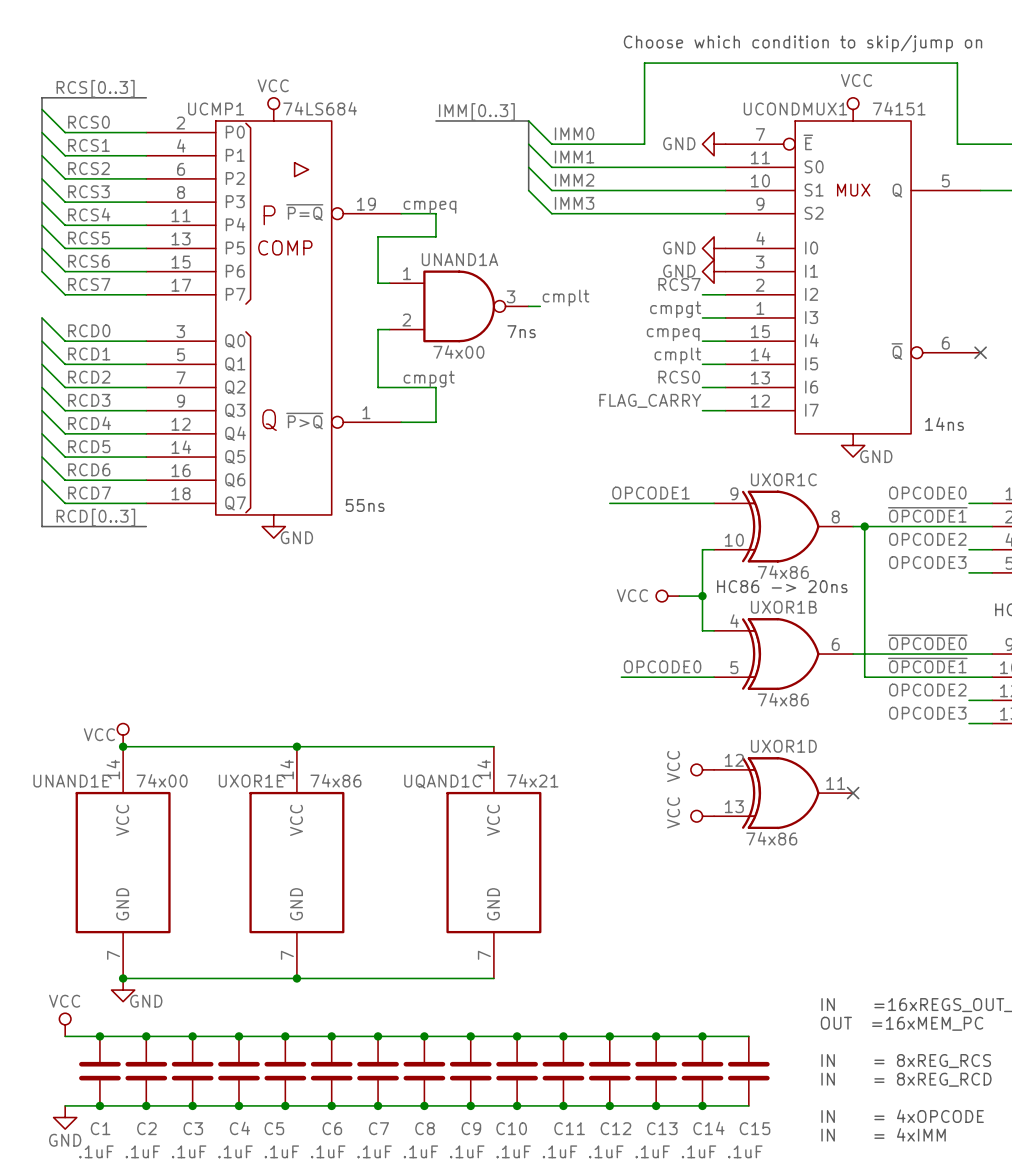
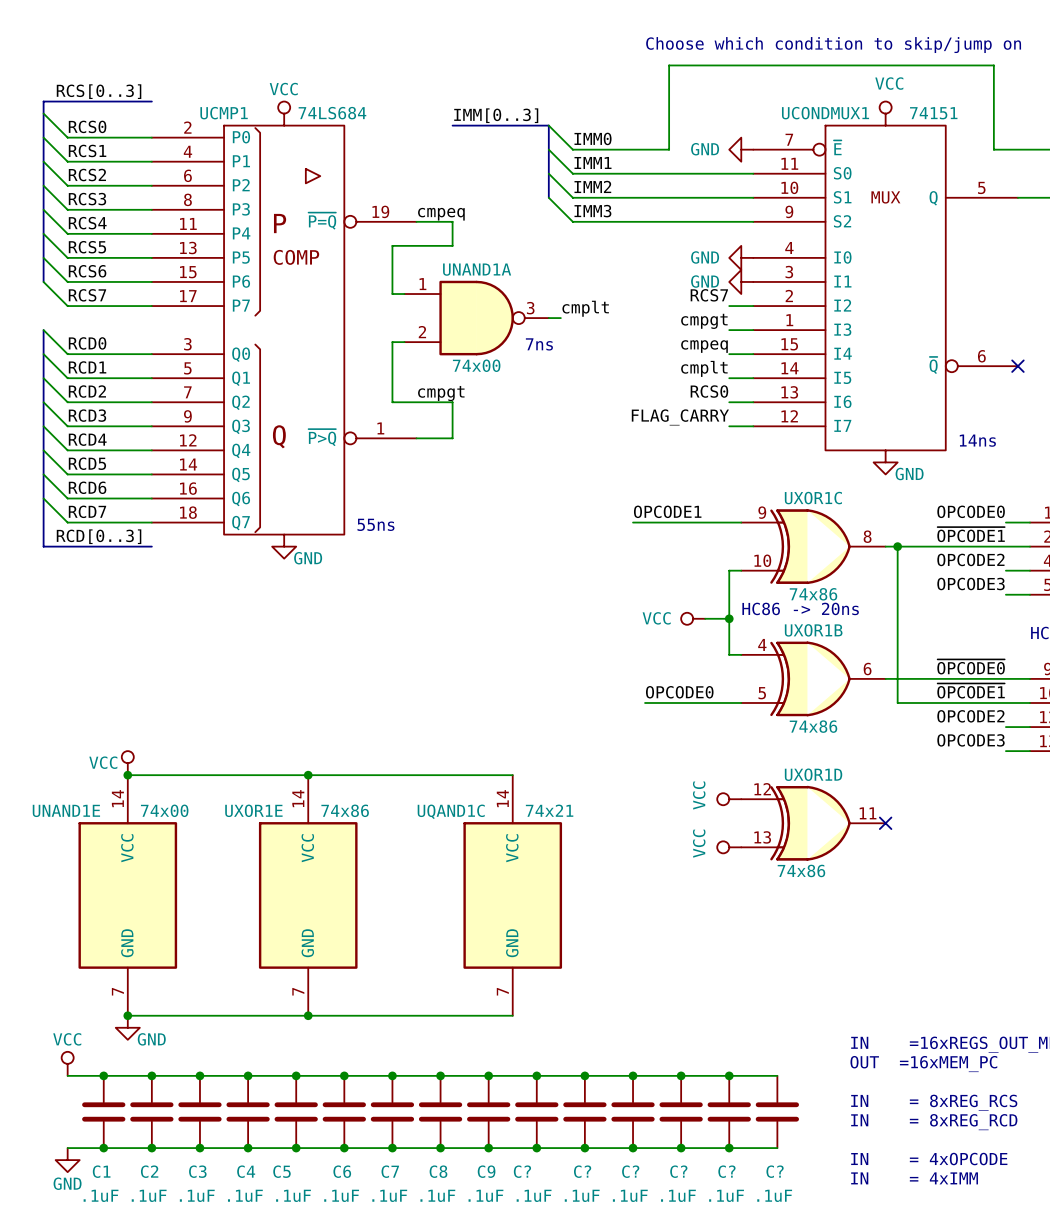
C10 name: C10 (511, 1128) -> C? (522, 1171)
C11 name: C11 (569, 1128) -> C? (582, 1171)
C12 name: C12 (615, 1128) -> C? (630, 1171)
C13 name: C13 (662, 1128) -> C? (678, 1171)
C14 name: C14 (708, 1128) -> C? (726, 1171)
C15 name: C15 (755, 1128) -> C? (775, 1171)

